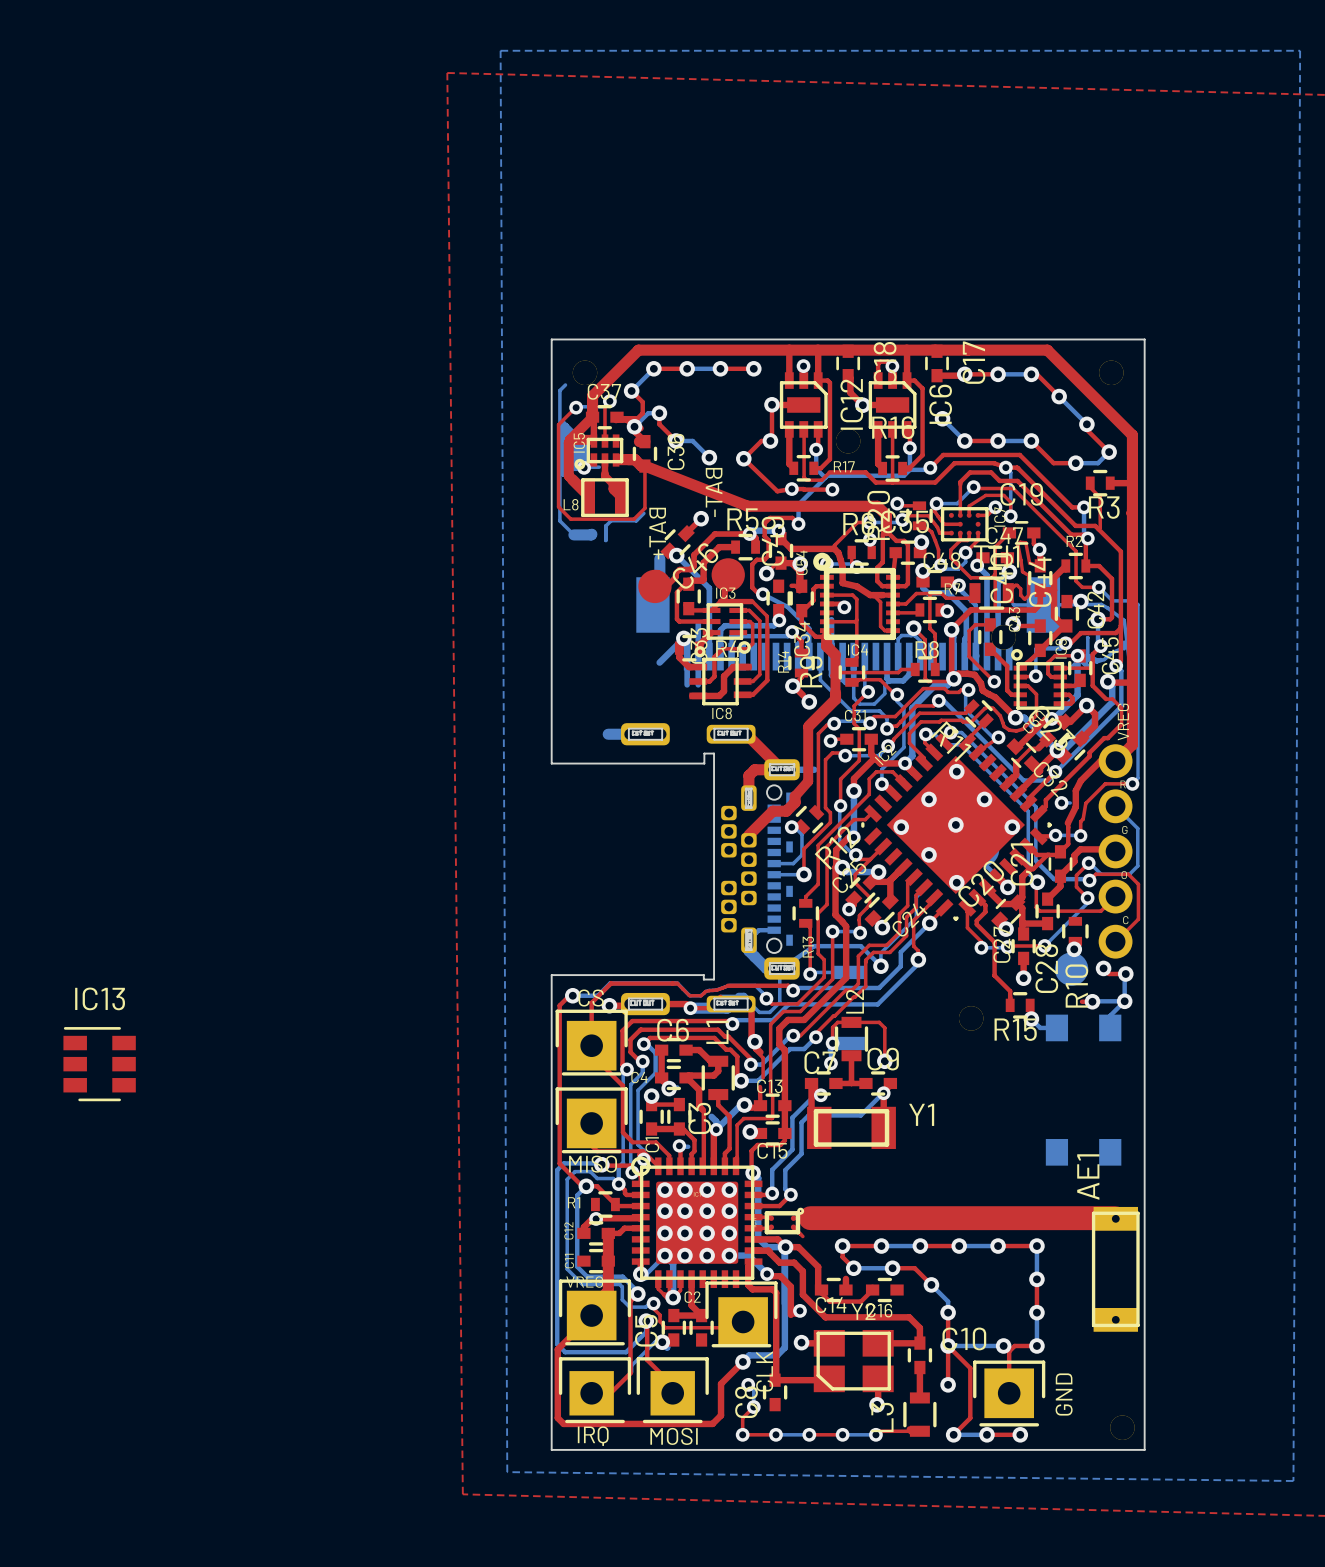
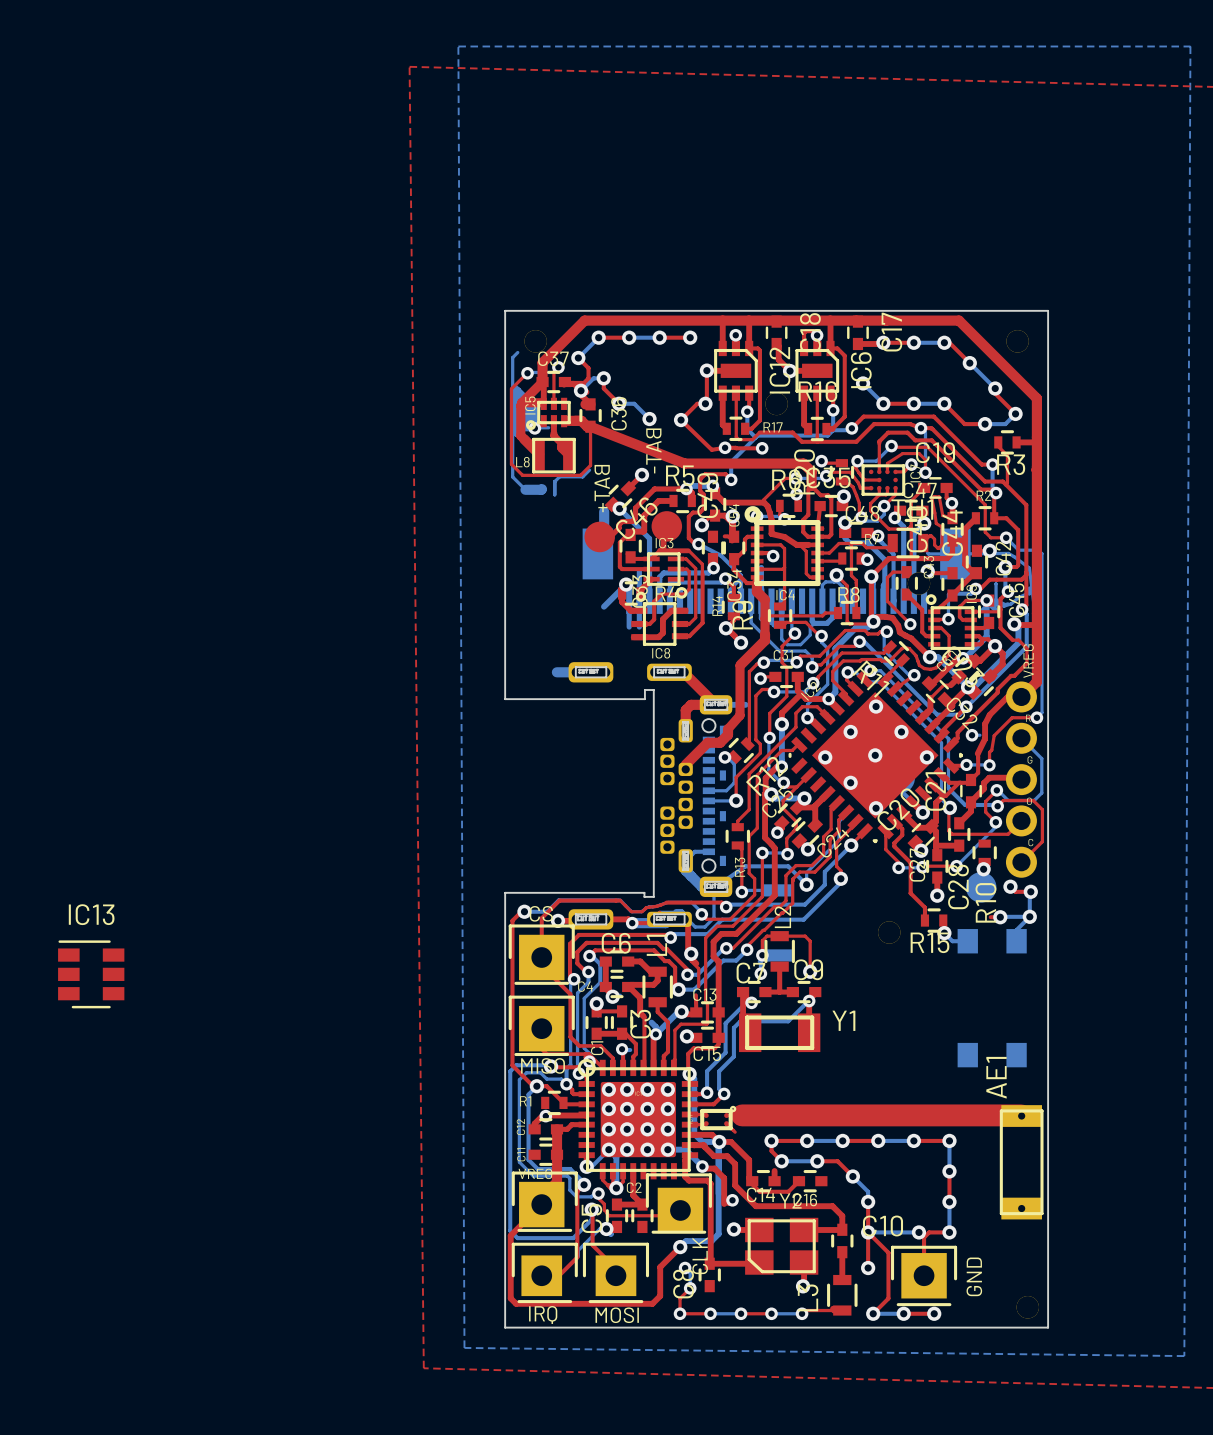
top track: none -> (982, 639) (988, 639) (995, 646)

